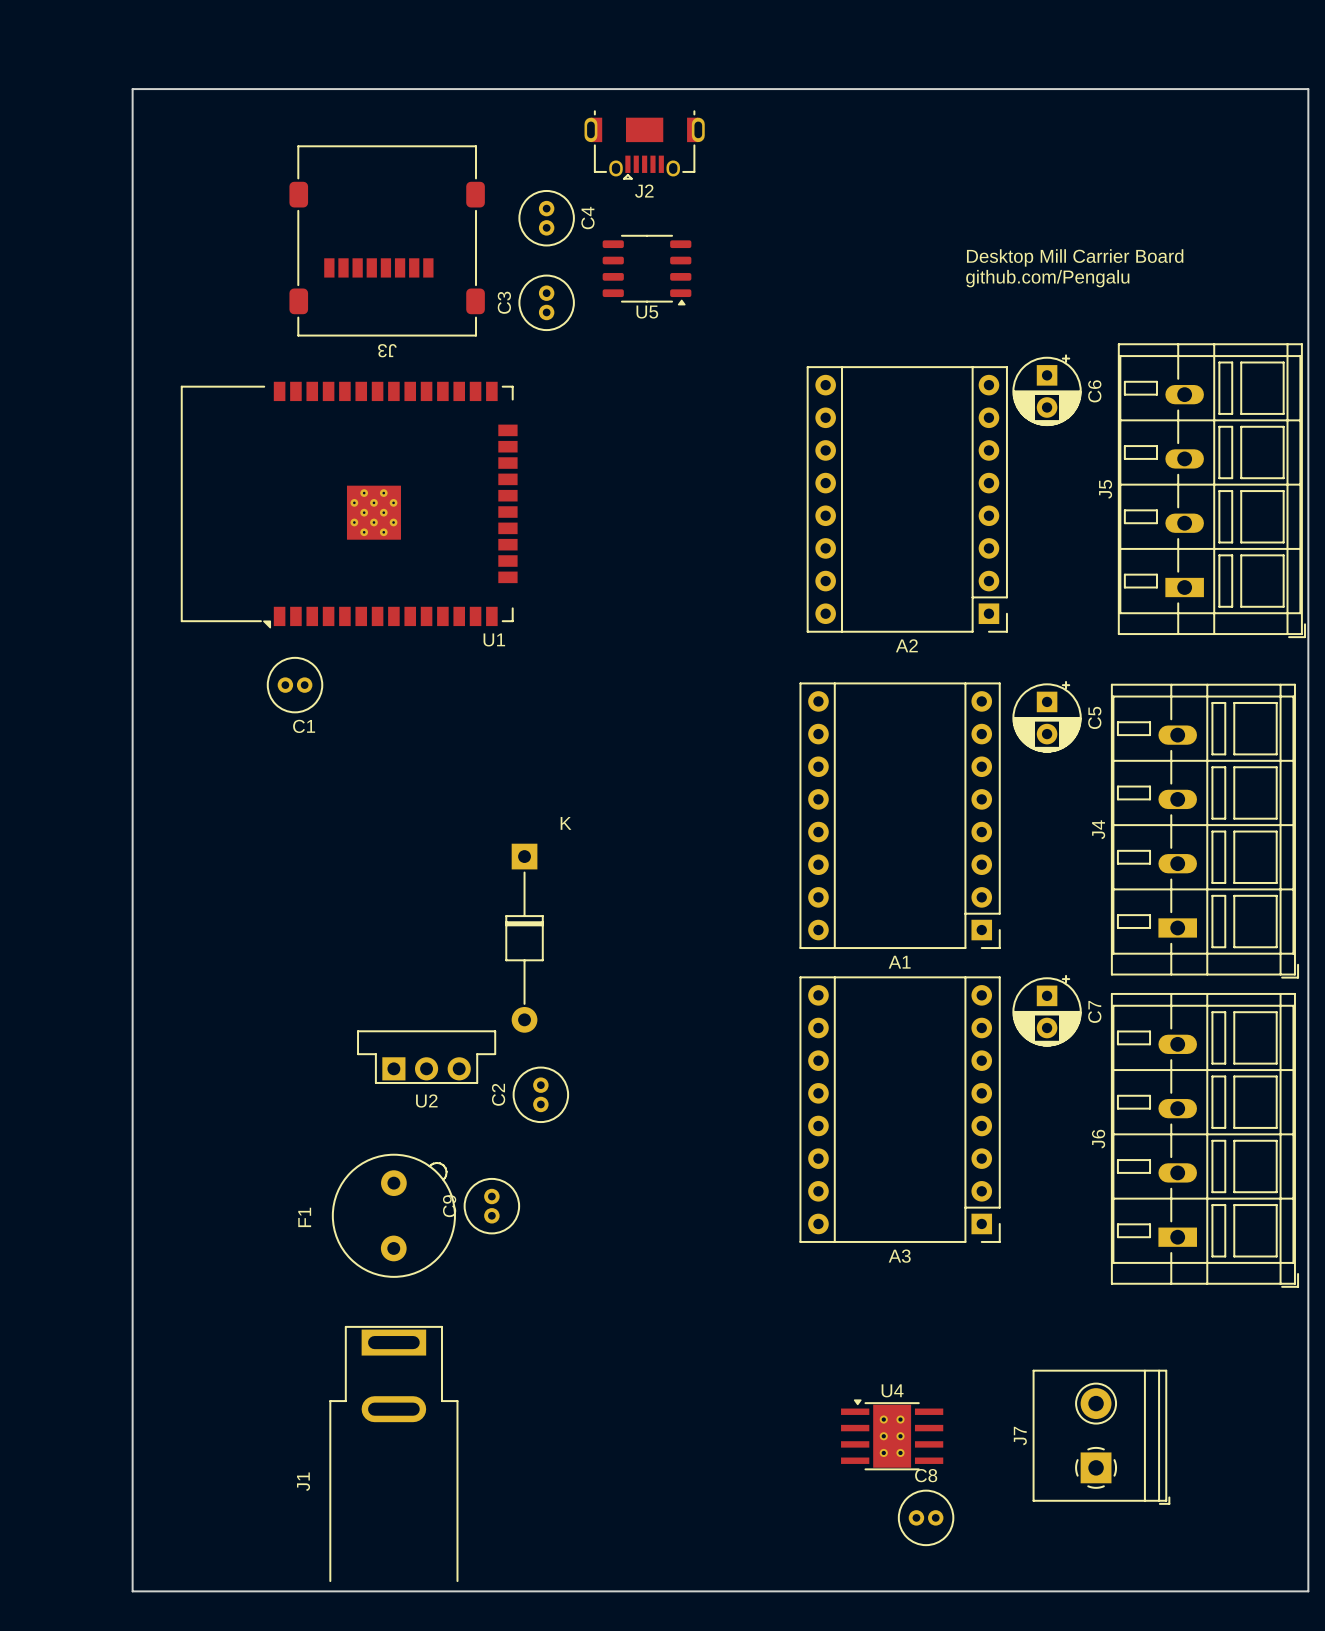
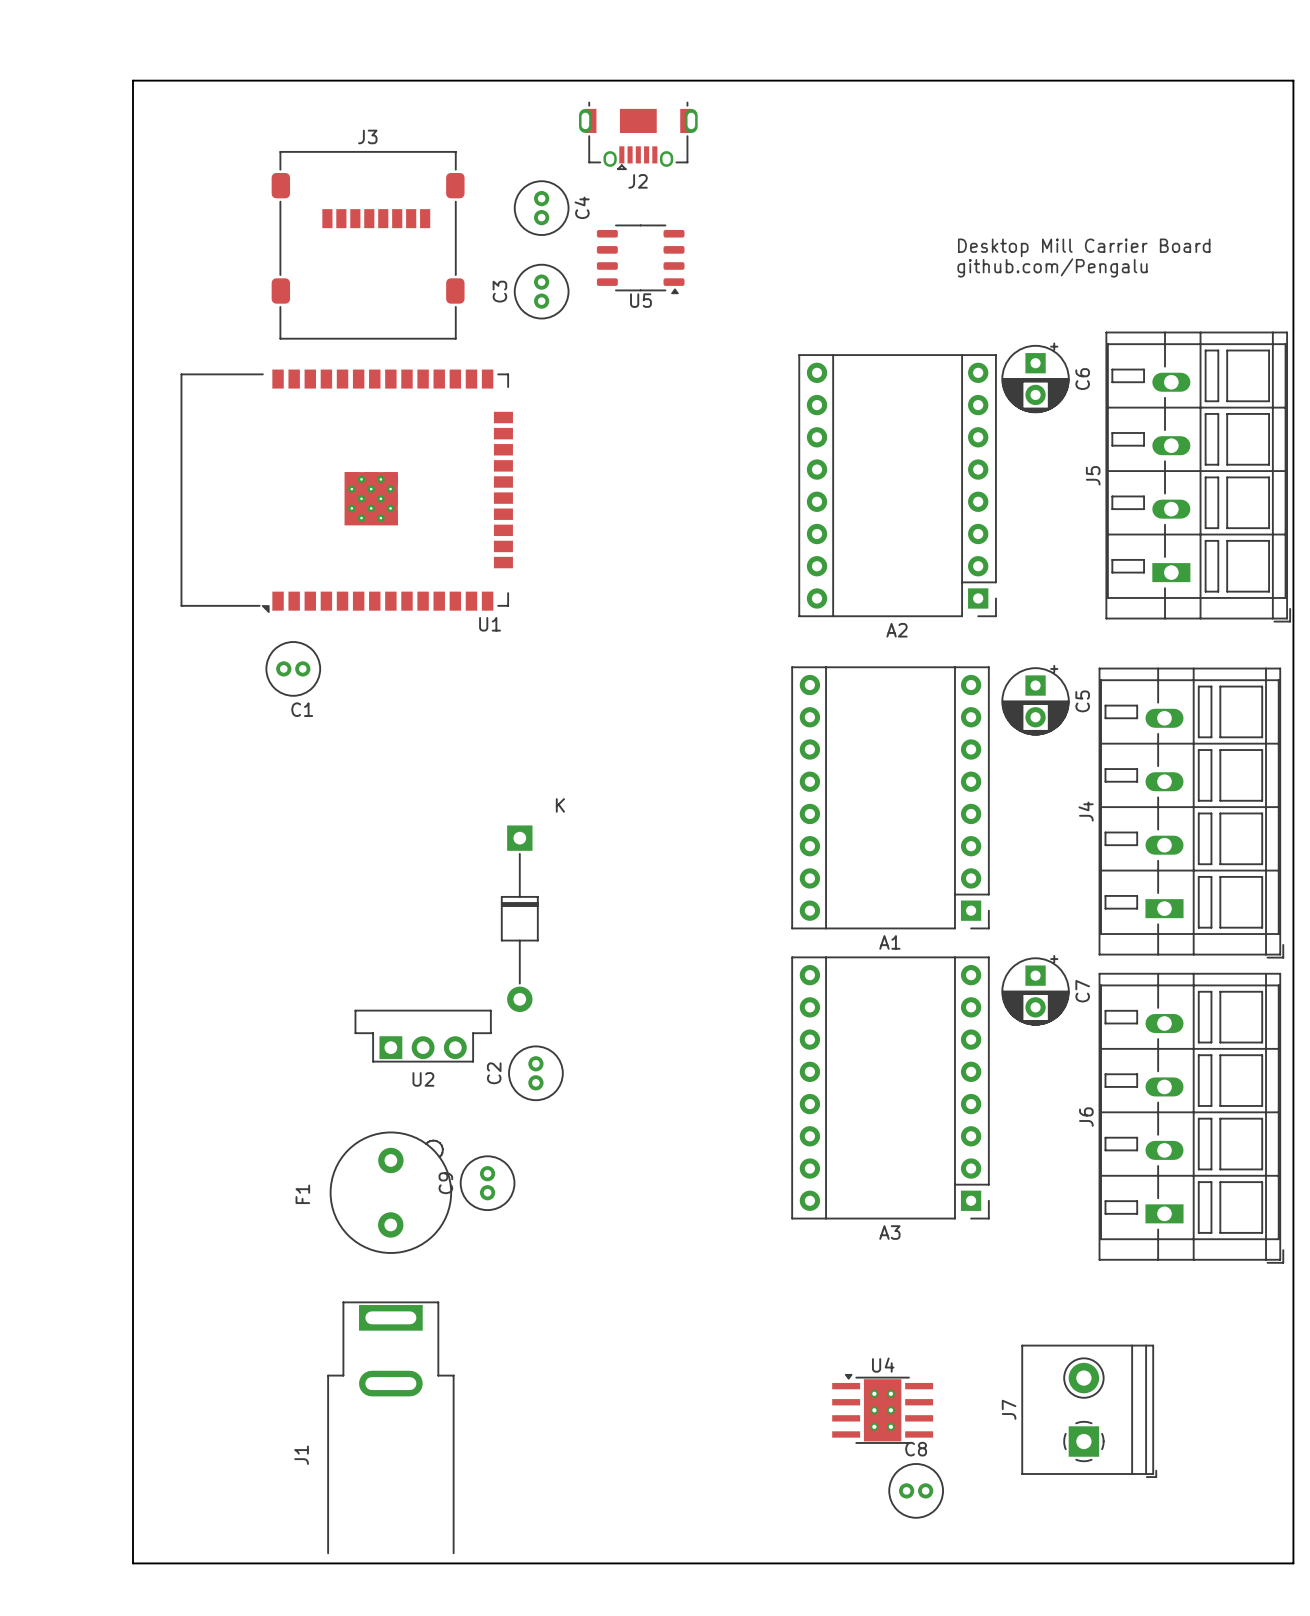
J3 rotation: 0° (387, 240) -> 180° (368, 245)

